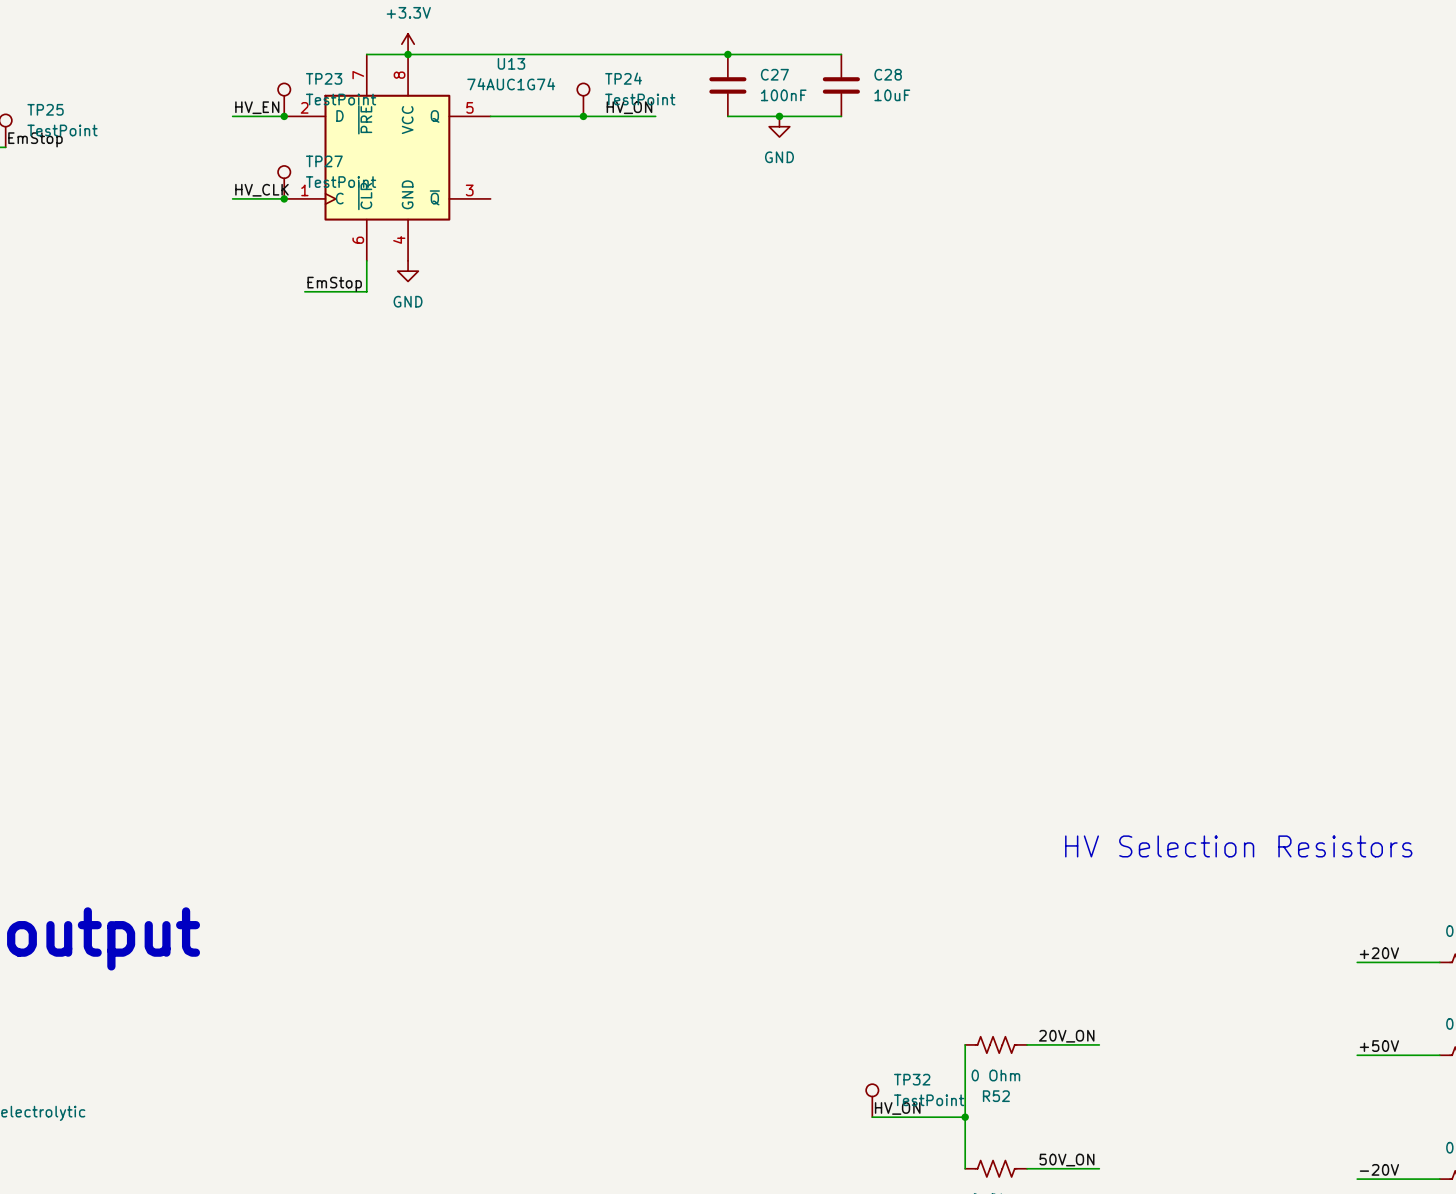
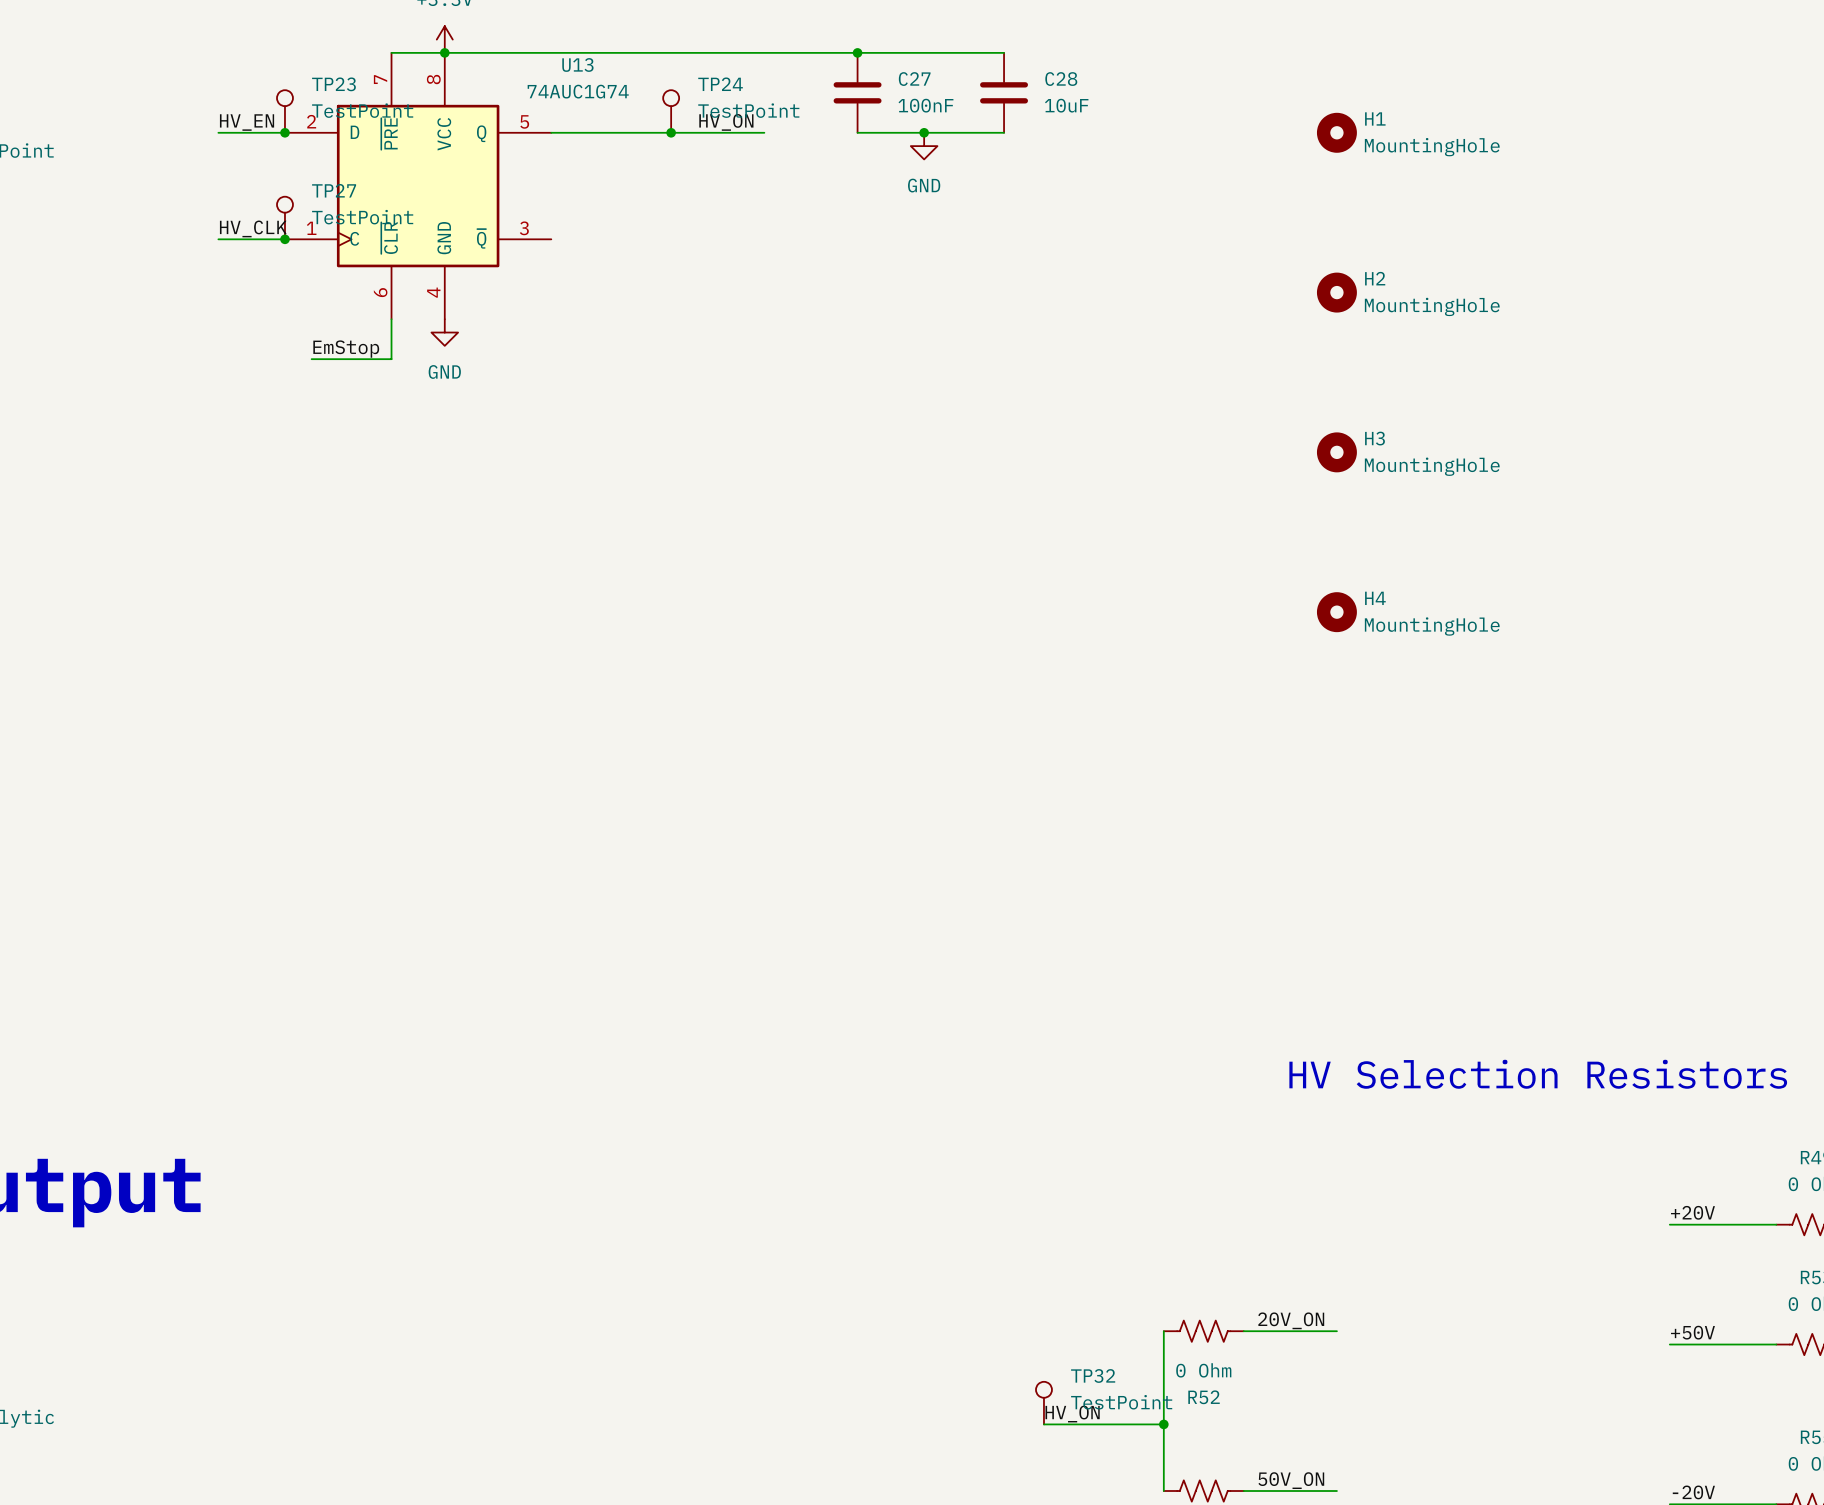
H1: none -> MountingHole (1336, 132)
H2: none -> MountingHole (1336, 292)
H3: none -> MountingHole (1336, 452)
H4: none -> MountingHole (1336, 612)

